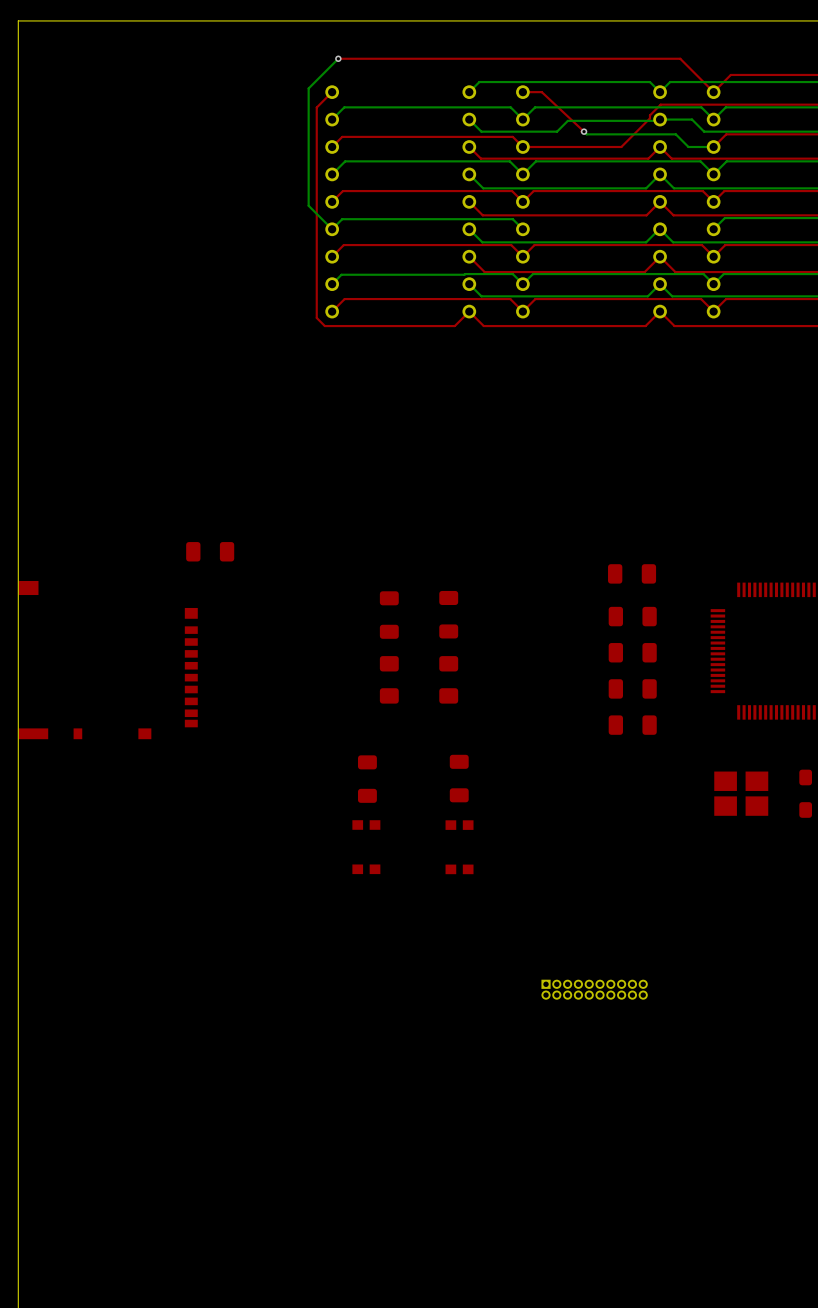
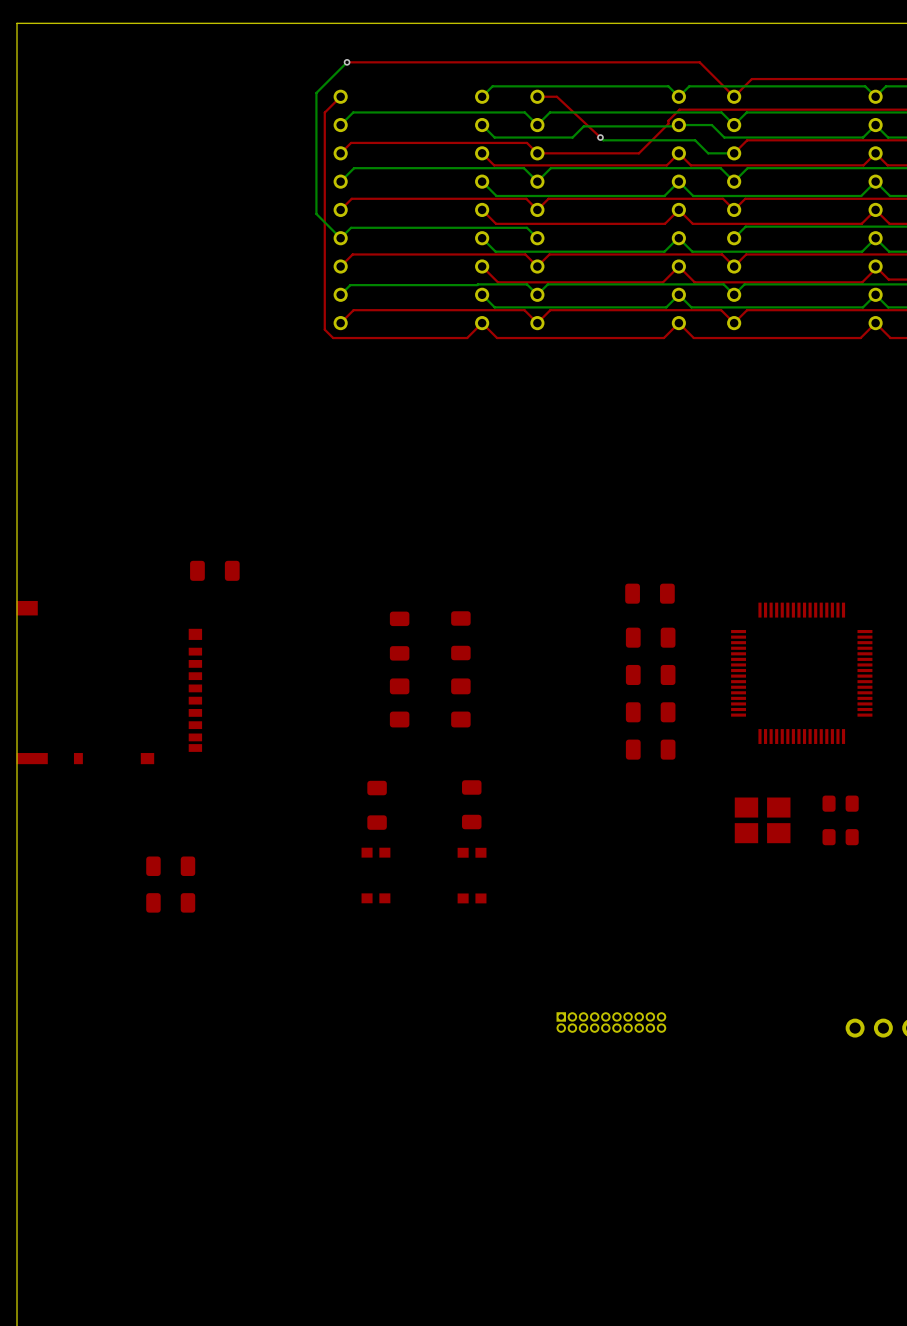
part: none -> (170, 866)
part: none -> (170, 902)

